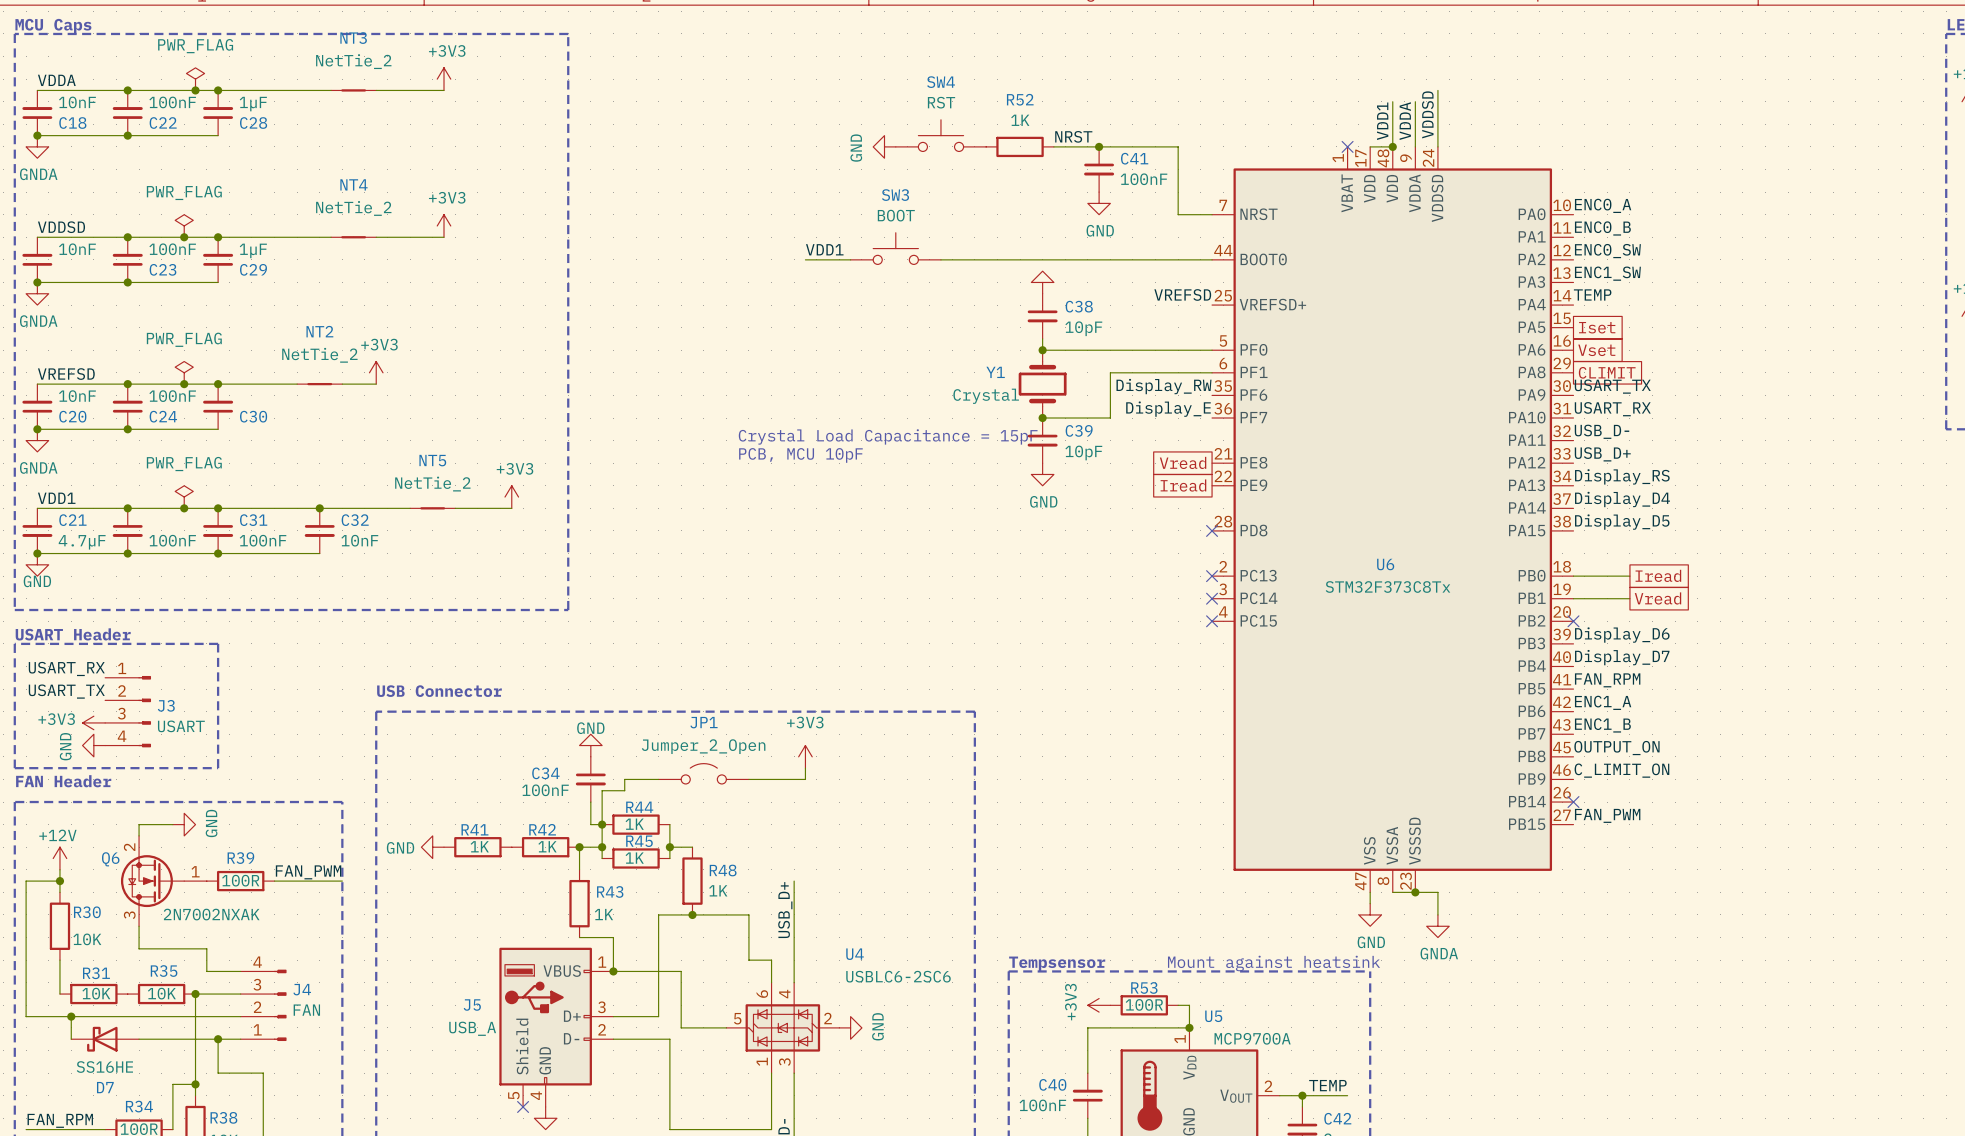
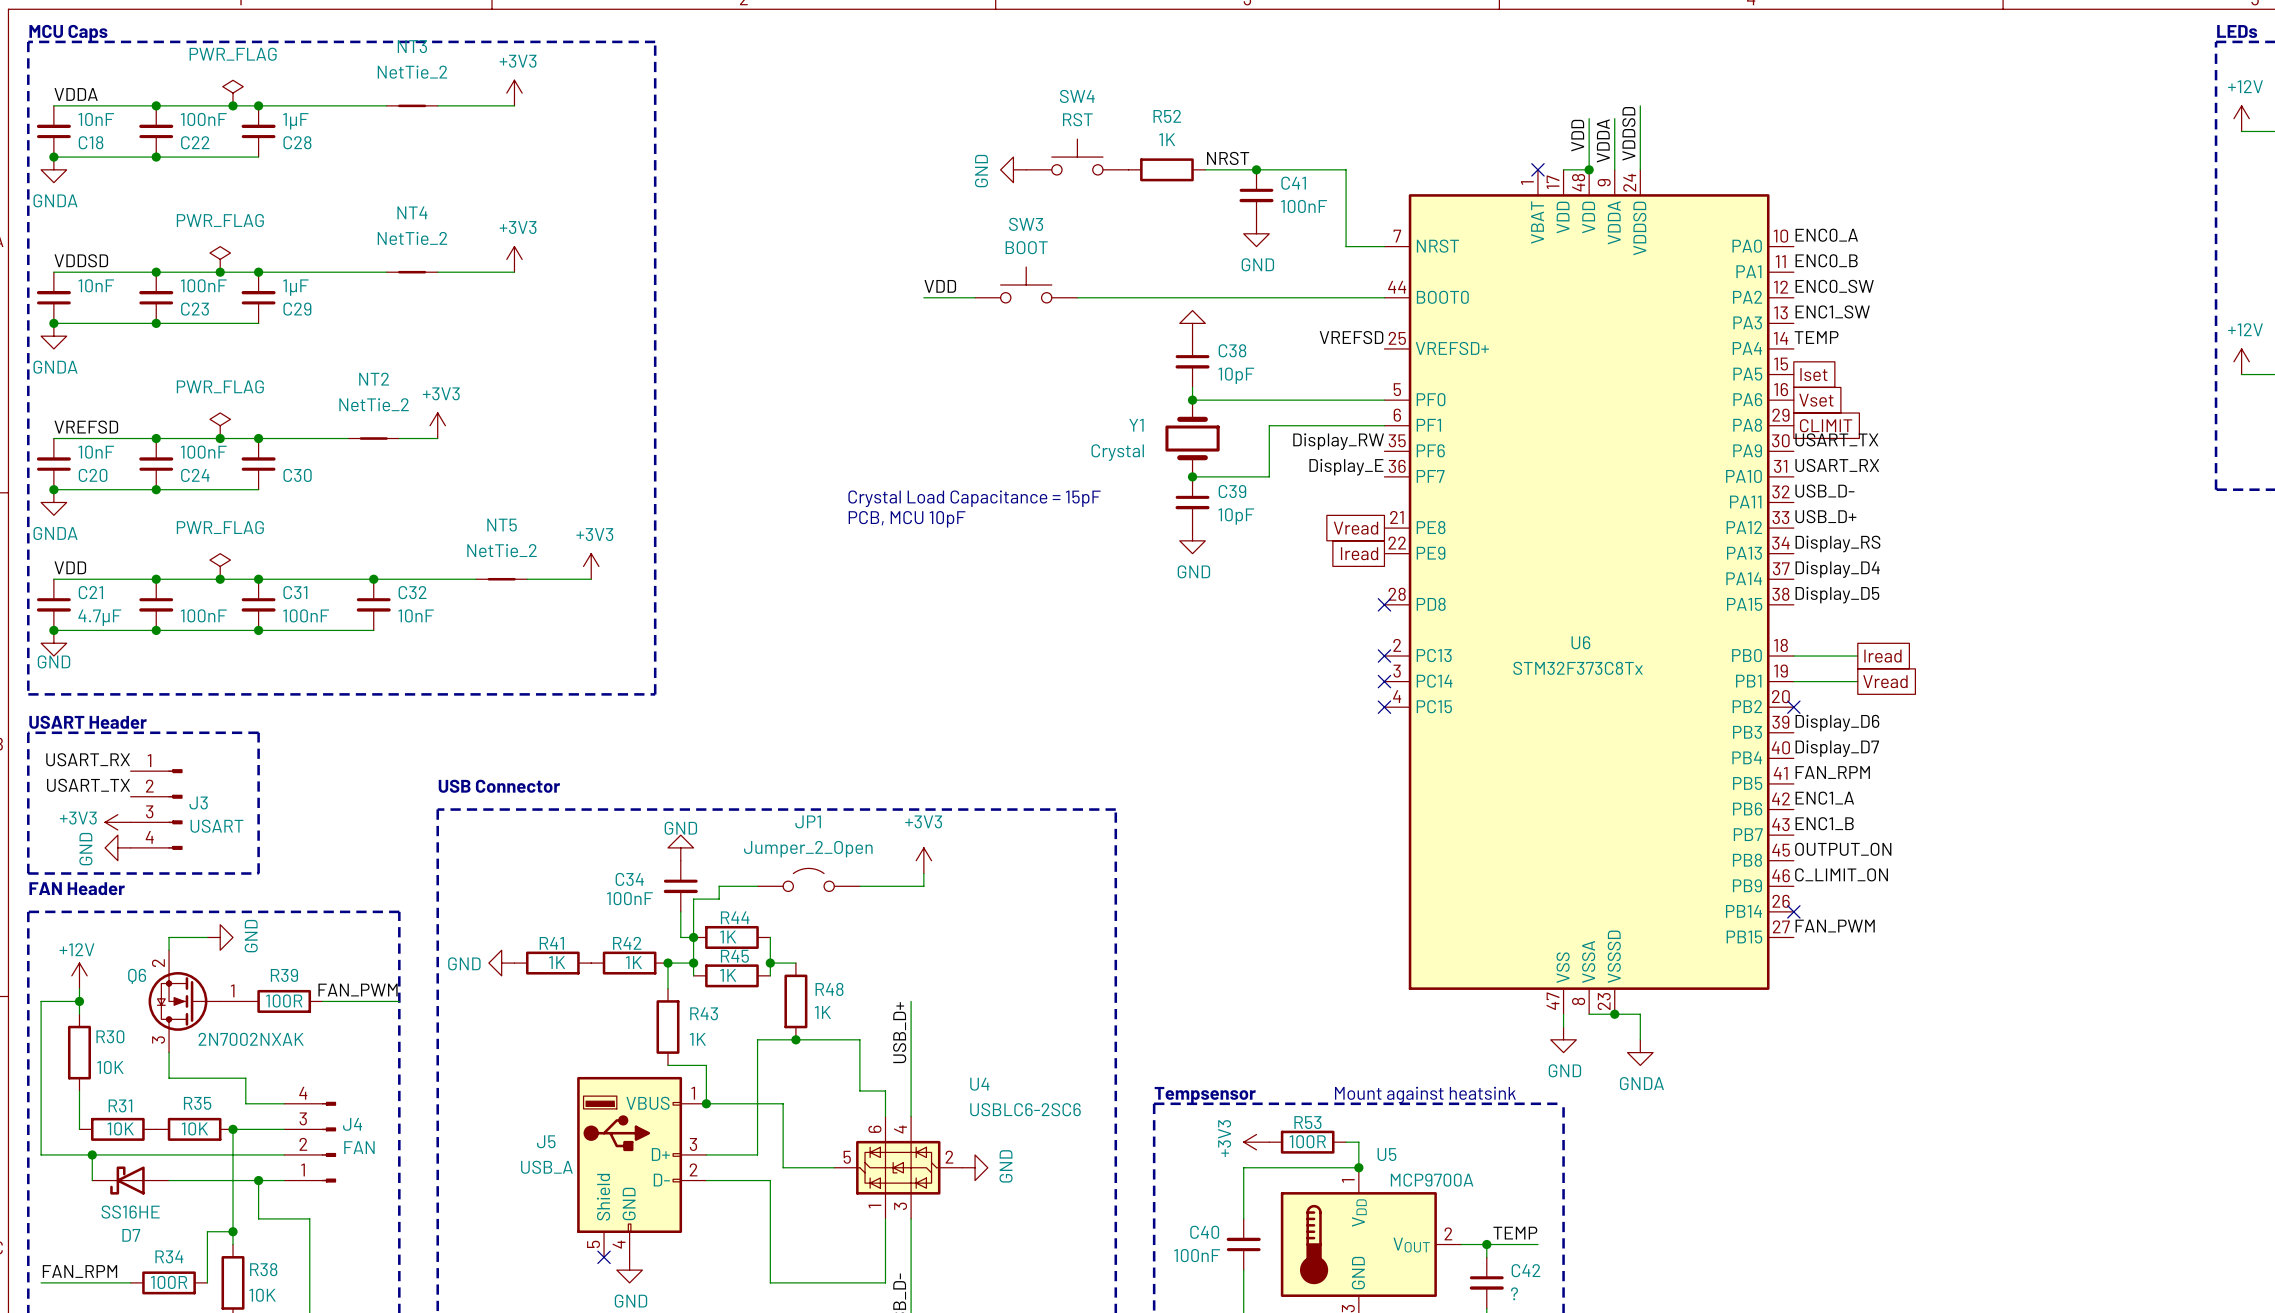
label: VDD1 (1382, 121) -> VDD (1577, 135)
label: VDD1 (824, 249) -> VDD (940, 286)
label: VDD1 (56, 498) -> VDD (70, 567)

